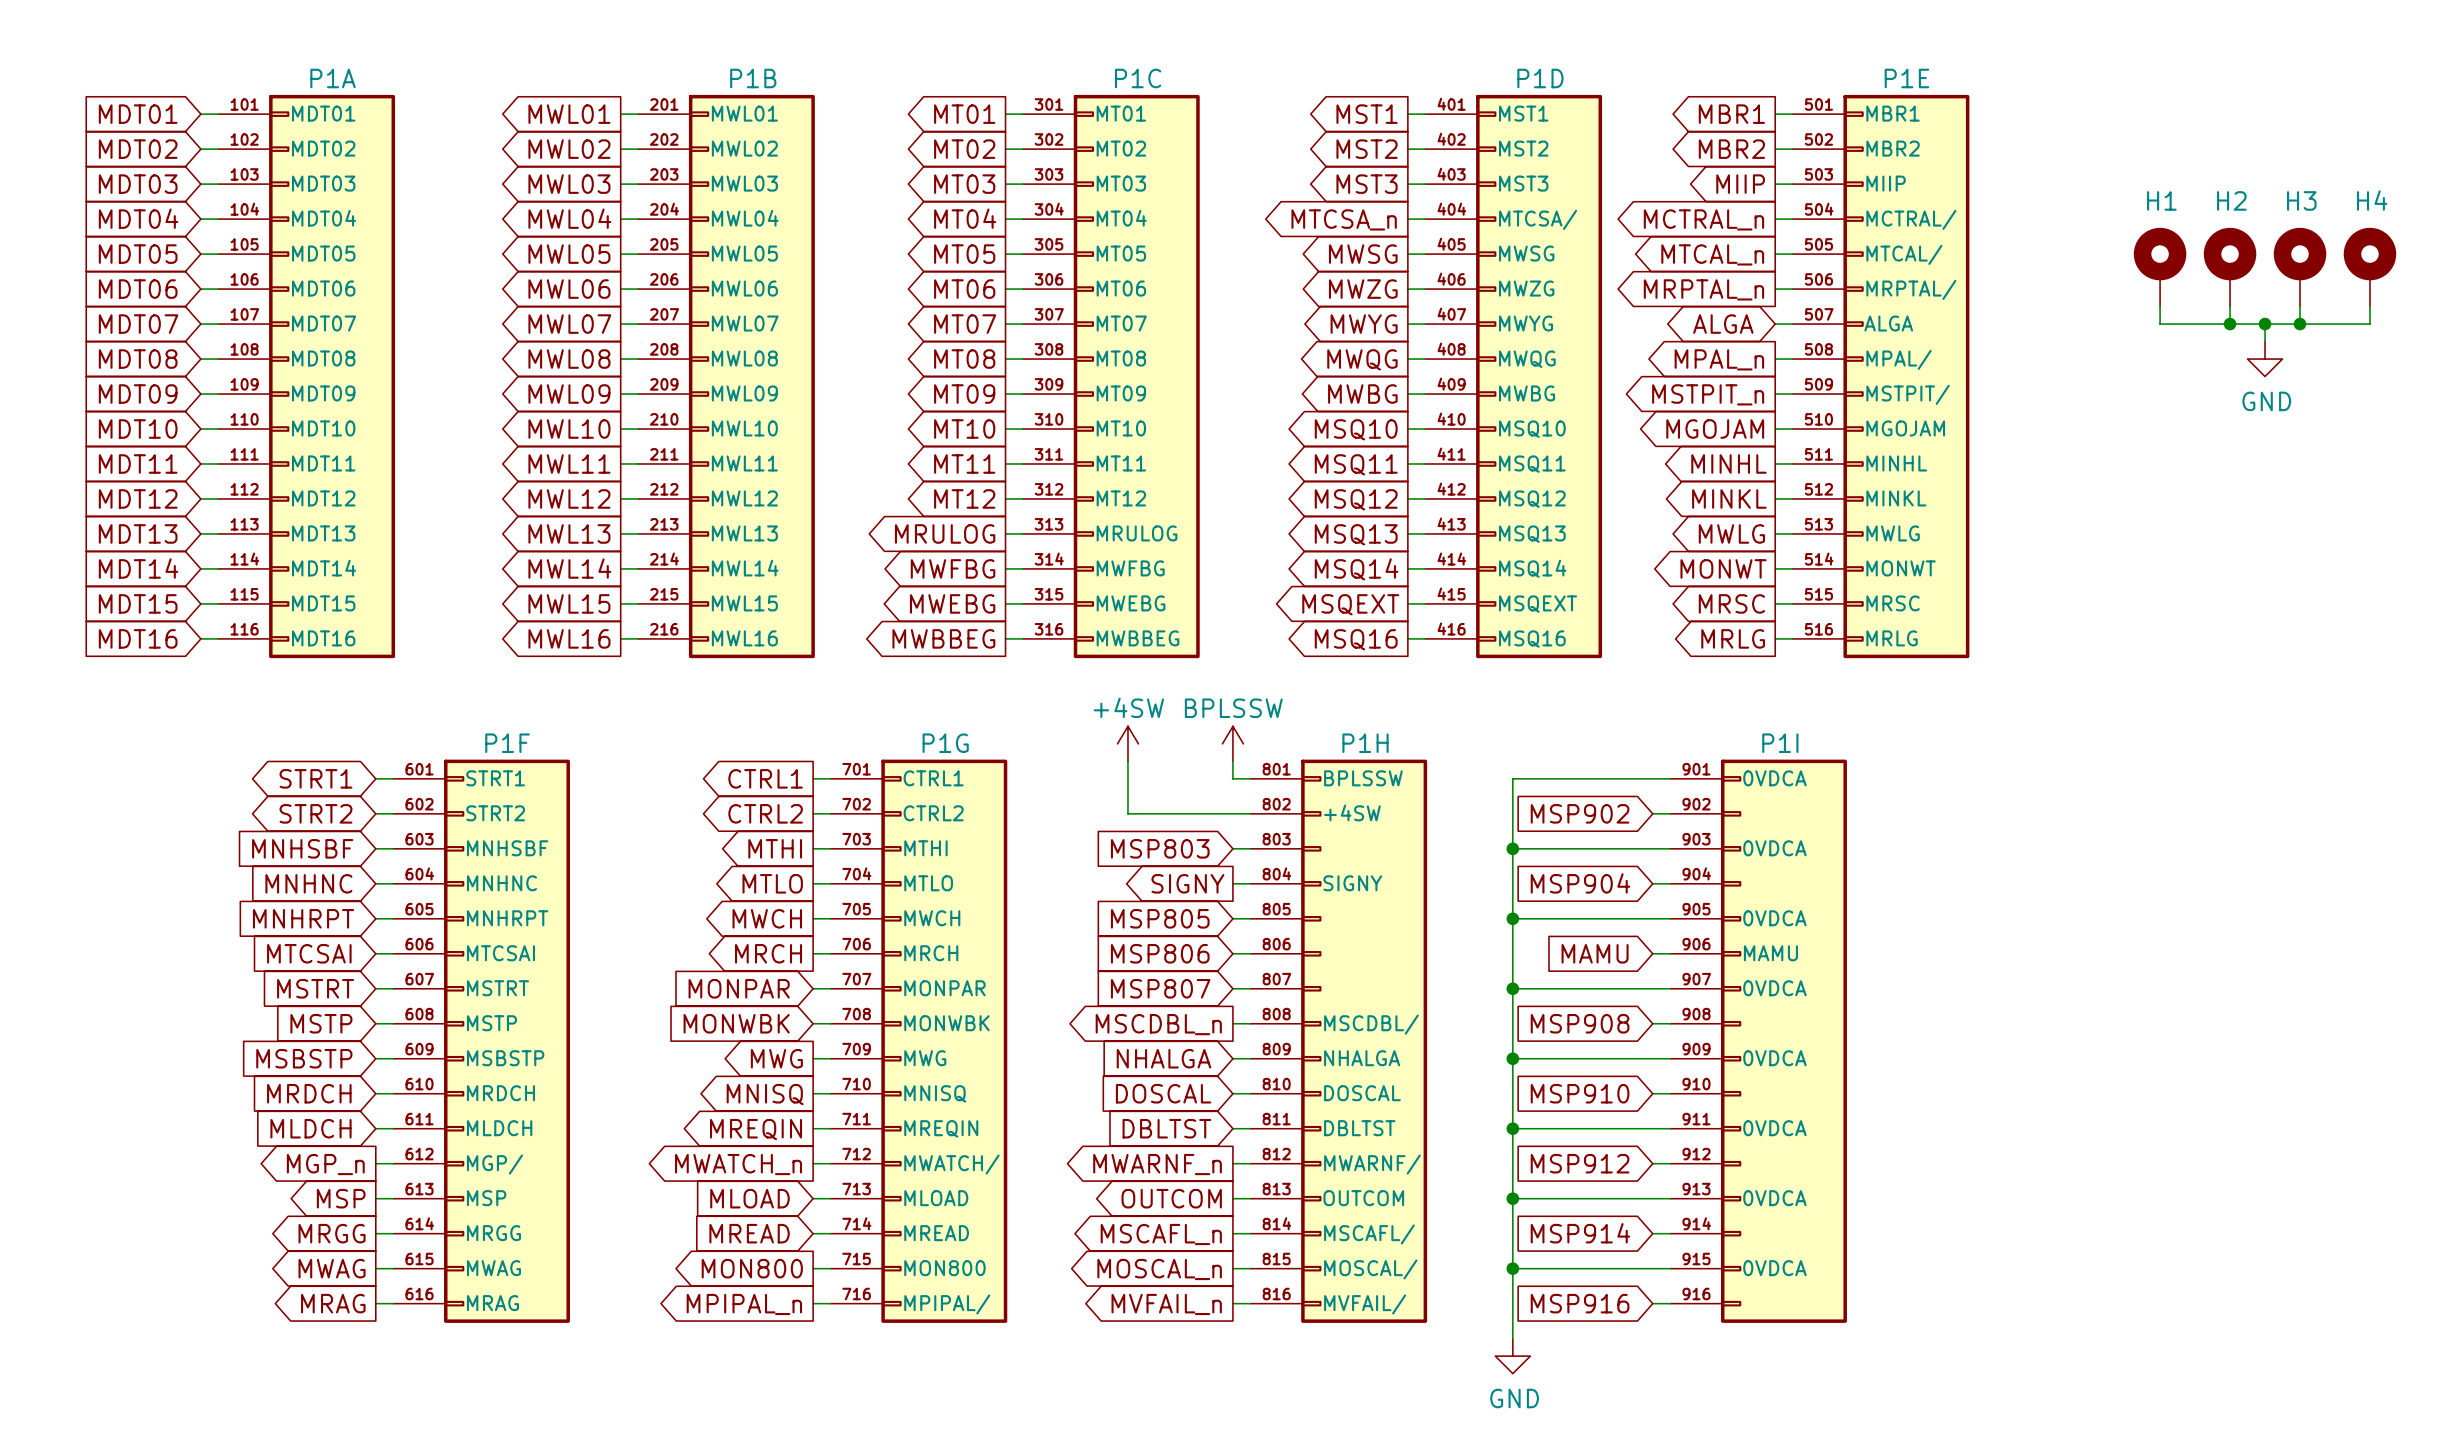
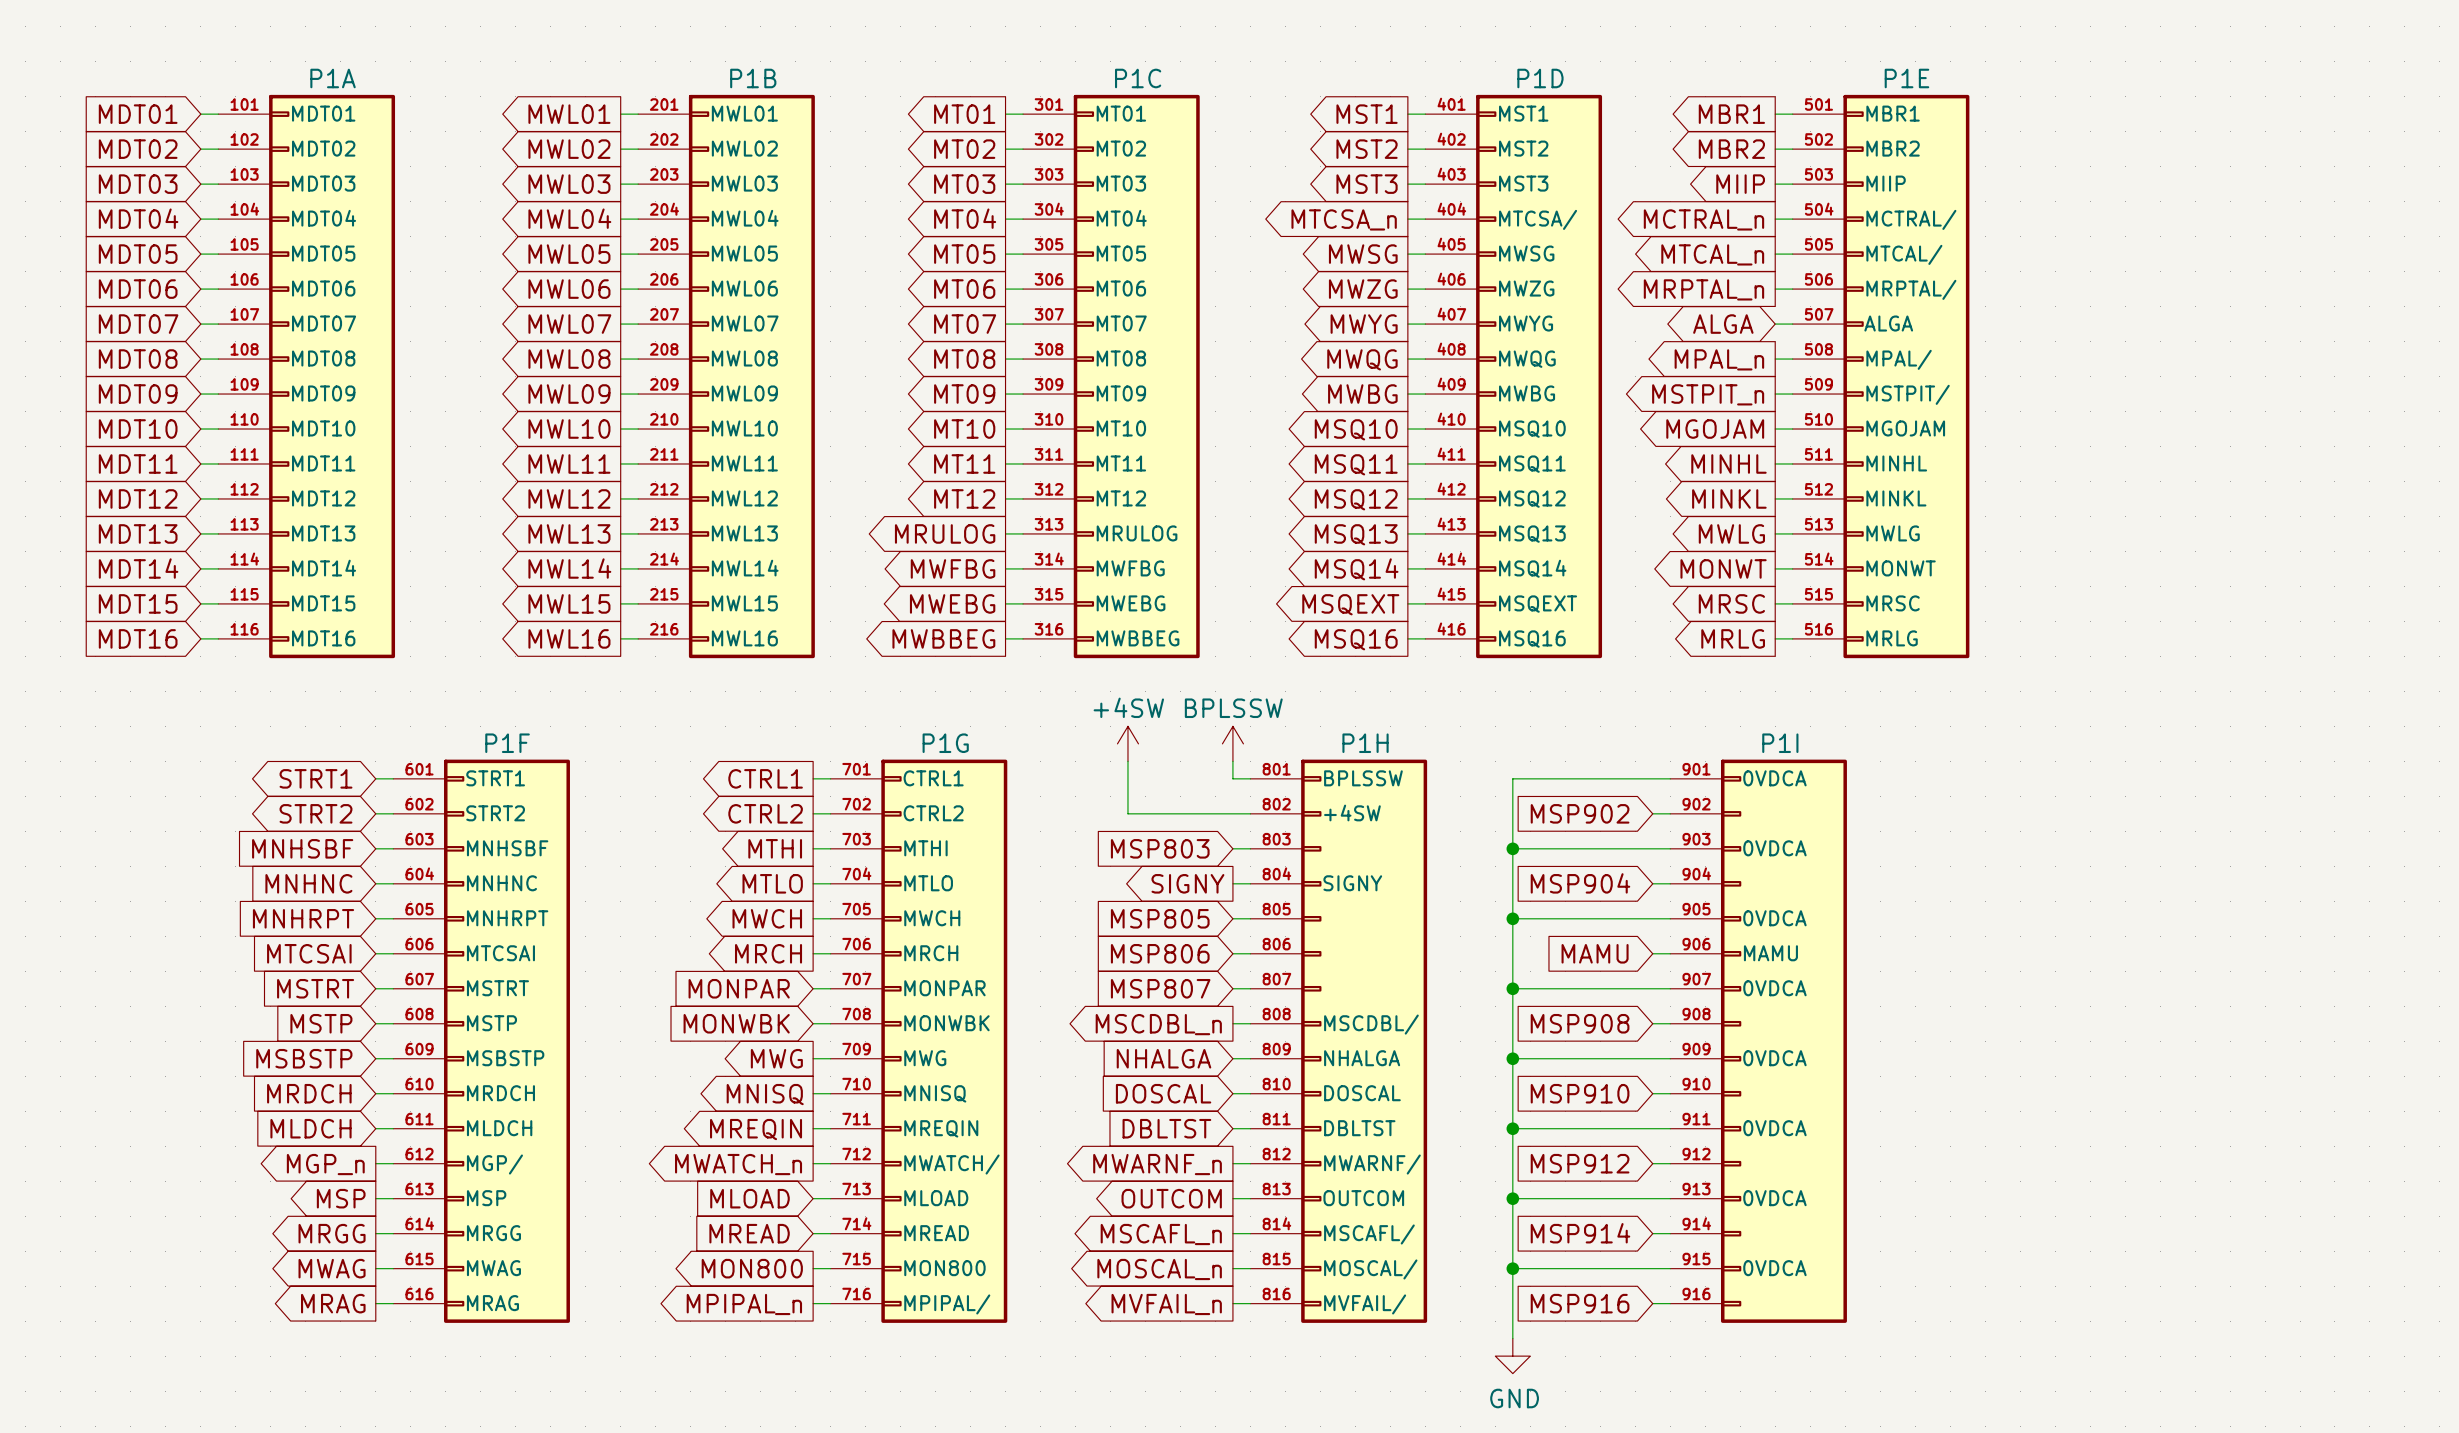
H1: (2160, 267) -> none
H2: (2230, 267) -> none
H3: (2300, 267) -> none
H4: (2369, 267) -> none
wire: (2160, 306) (2160, 324) (2369, 324) (2369, 306) -> none
wire: (2230, 306) (2230, 324) -> none
wire: (2300, 306) (2300, 324) -> none
junction: (2230, 324) -> none
wire: (2265, 324) (2265, 341) -> none
junction: (2265, 324) -> none
junction: (2300, 324) -> none
power symbol: GND (2265, 359) -> none

